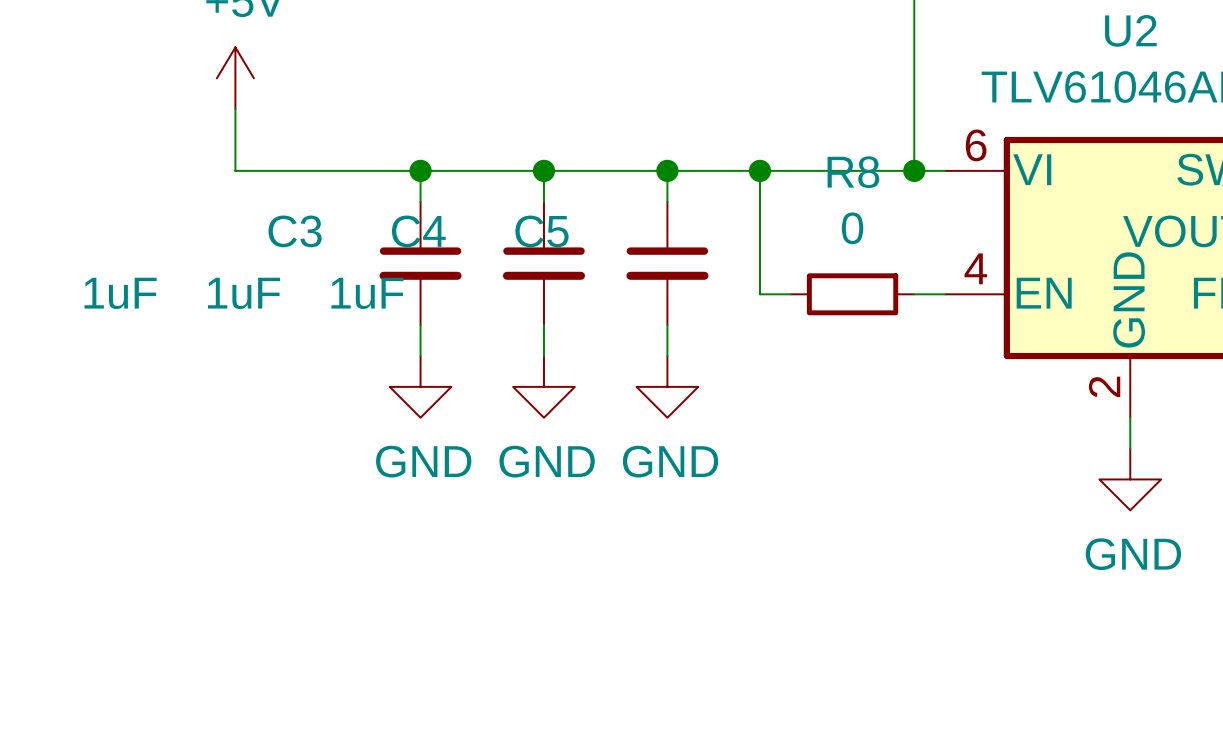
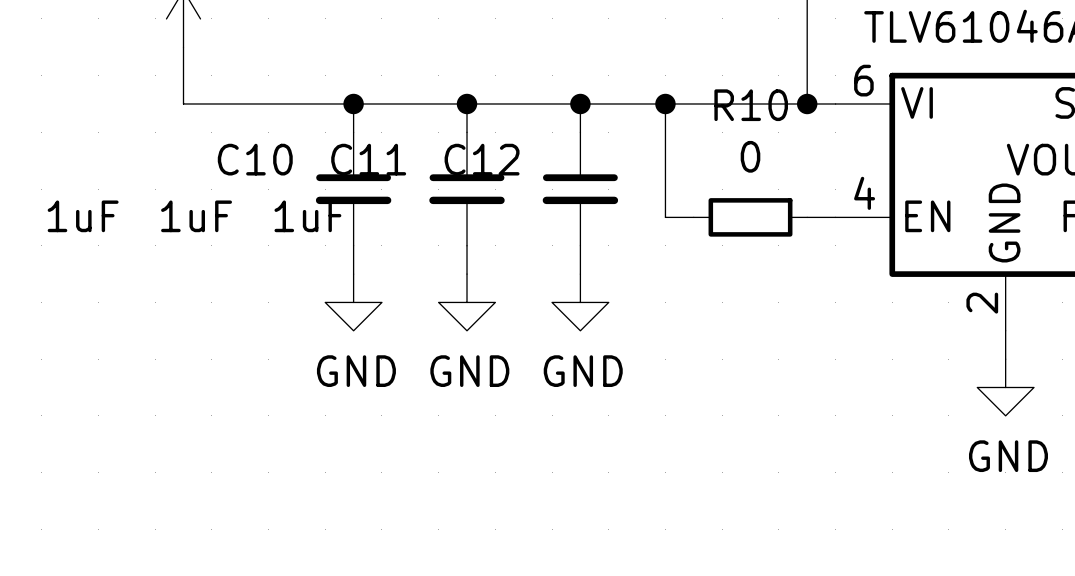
R8 name: R8 (853, 172) -> R10 (751, 105)
C3 name: C3 (295, 231) -> C10 (255, 159)
C4 name: C4 (418, 231) -> C11 (368, 159)
C5 name: C5 (541, 231) -> C12 (482, 159)

